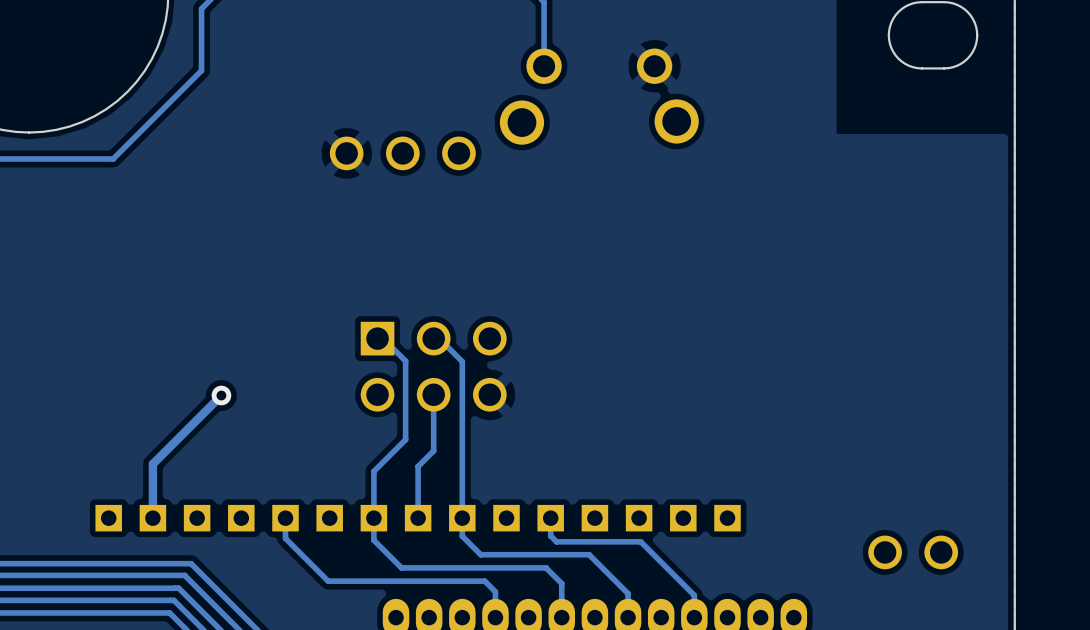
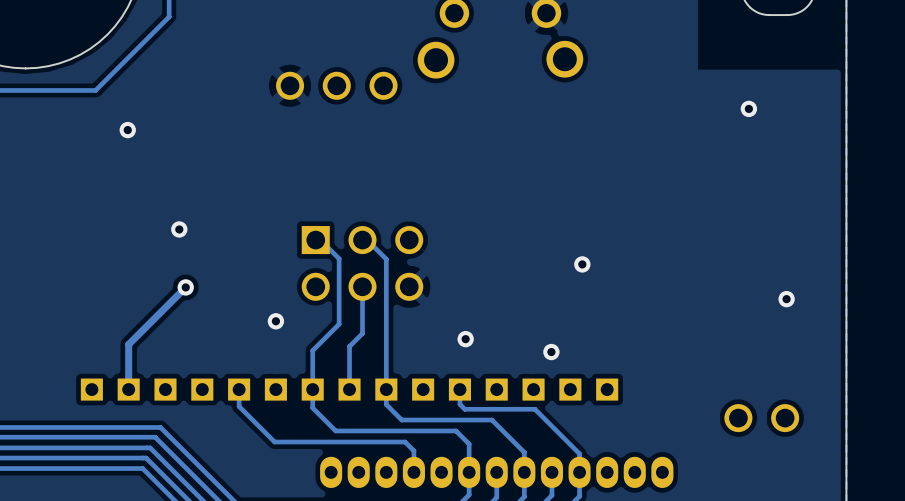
via: none -> (748, 108)
via: none -> (127, 130)
via: none -> (179, 229)
via: none -> (582, 264)
via: none -> (786, 299)
via: none -> (275, 321)
via: none -> (465, 339)
via: none -> (551, 352)

